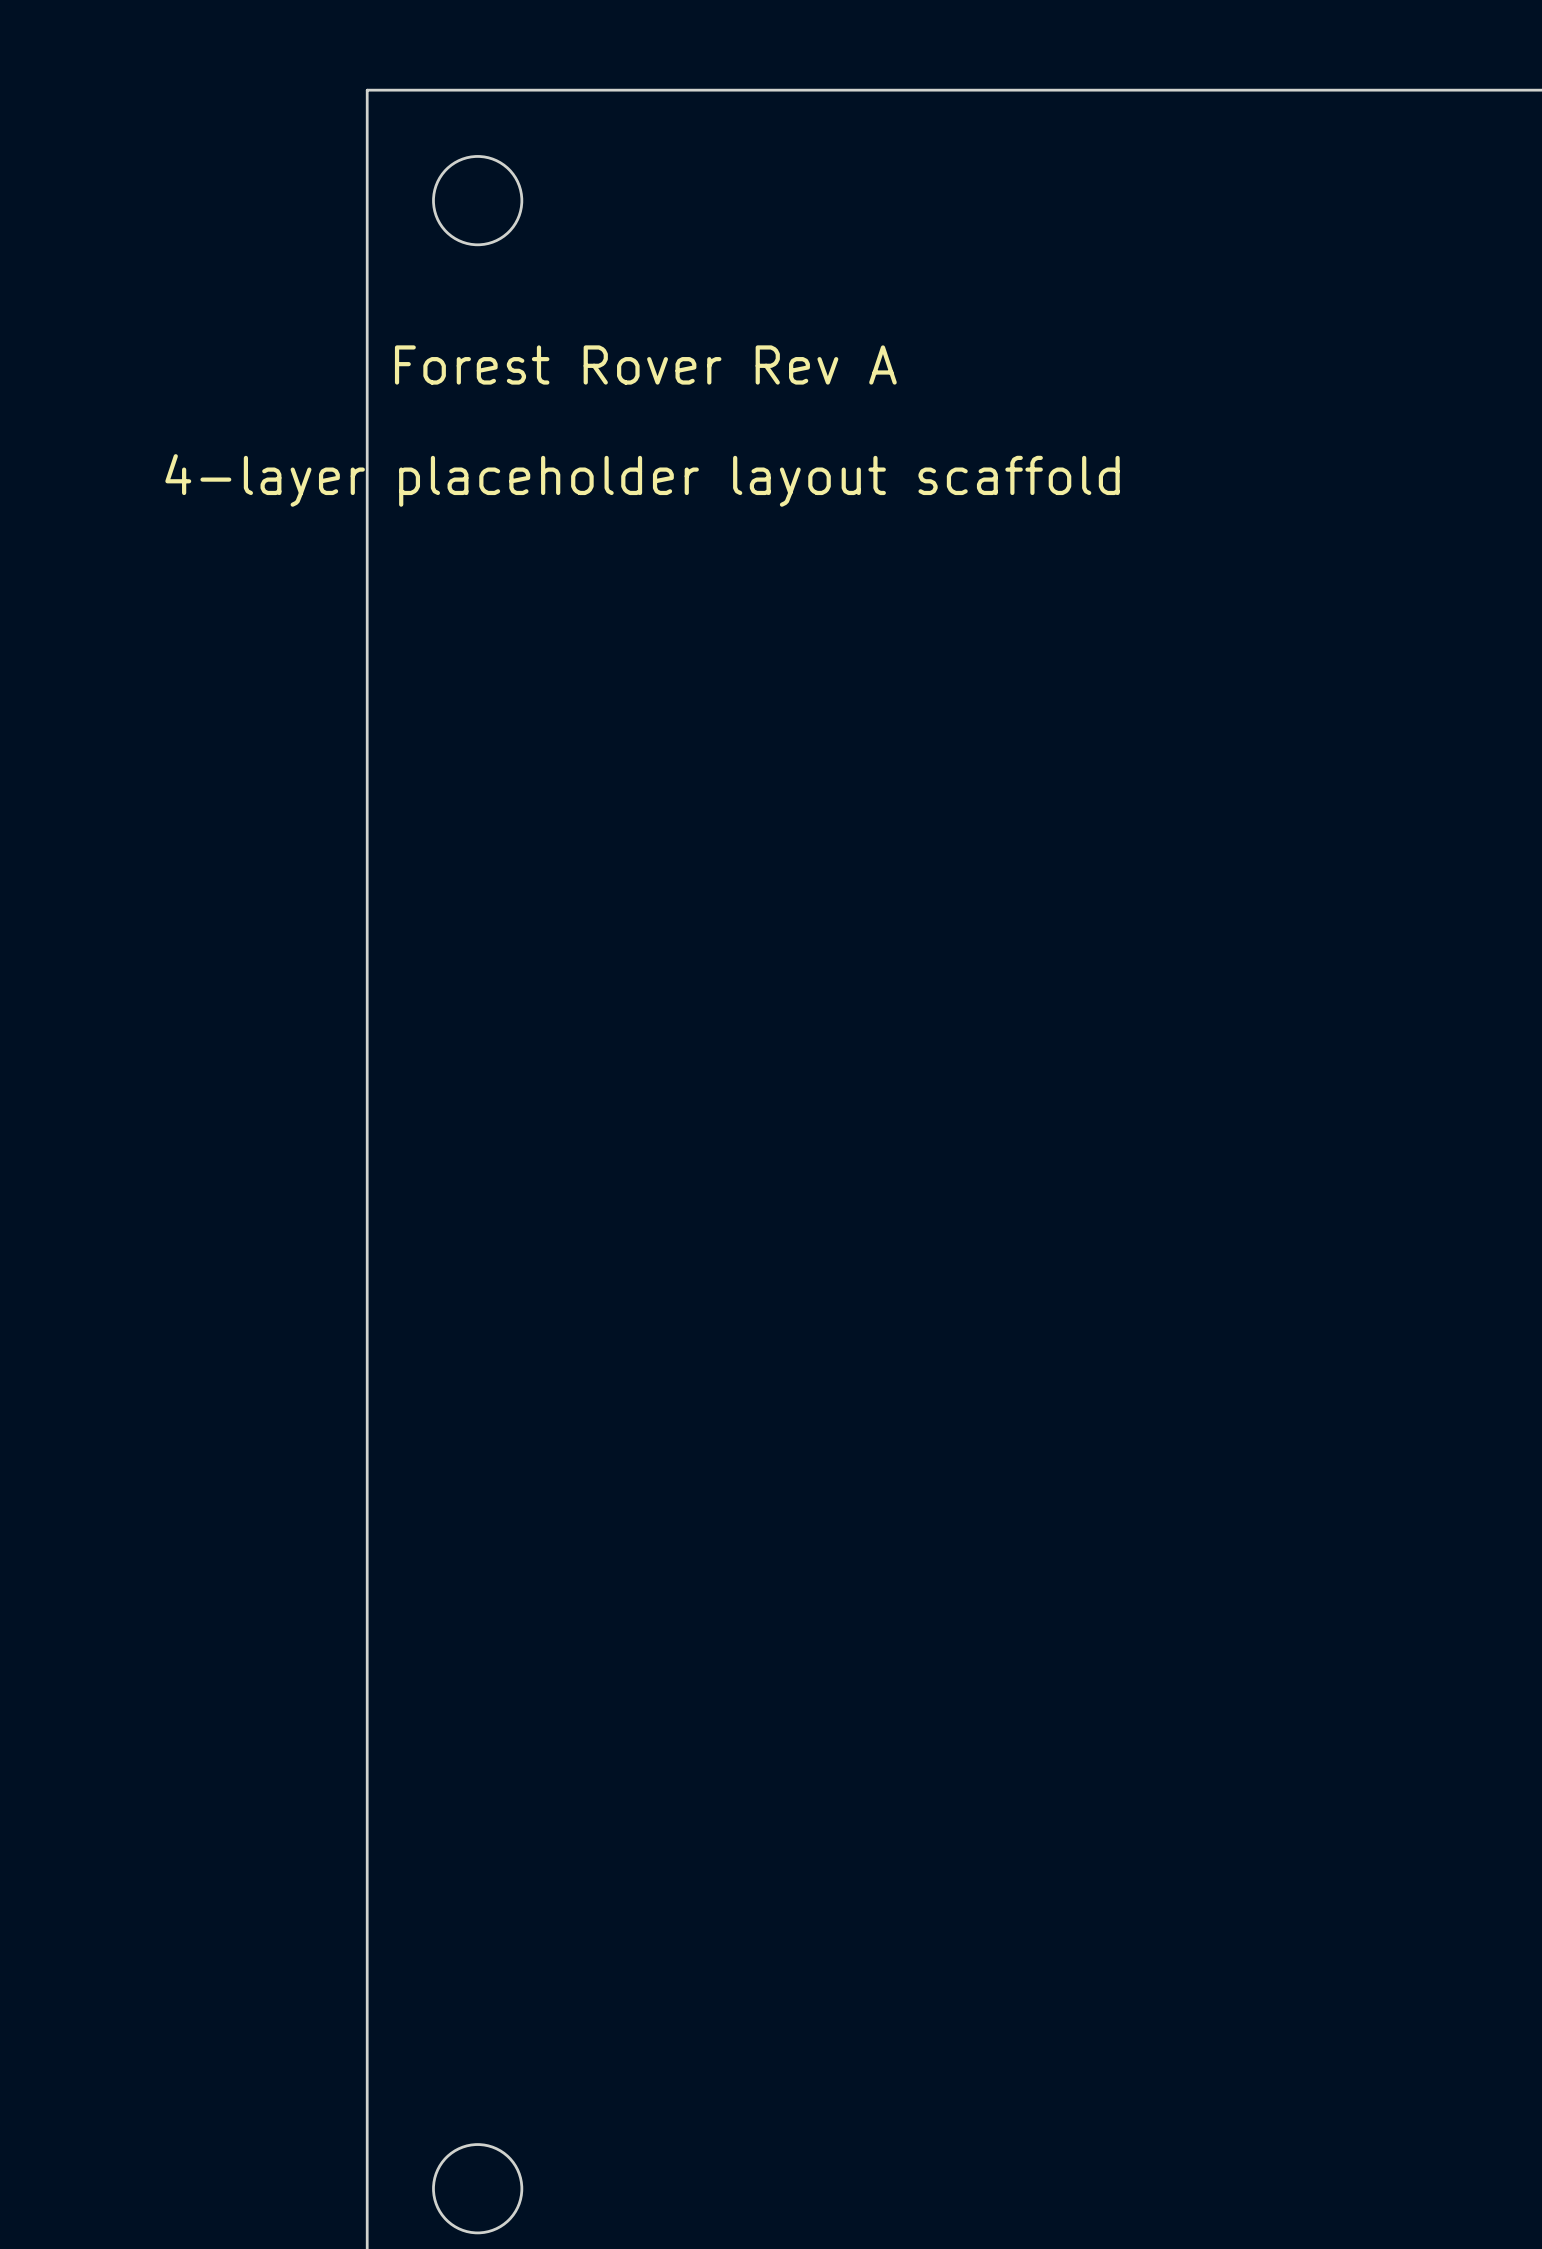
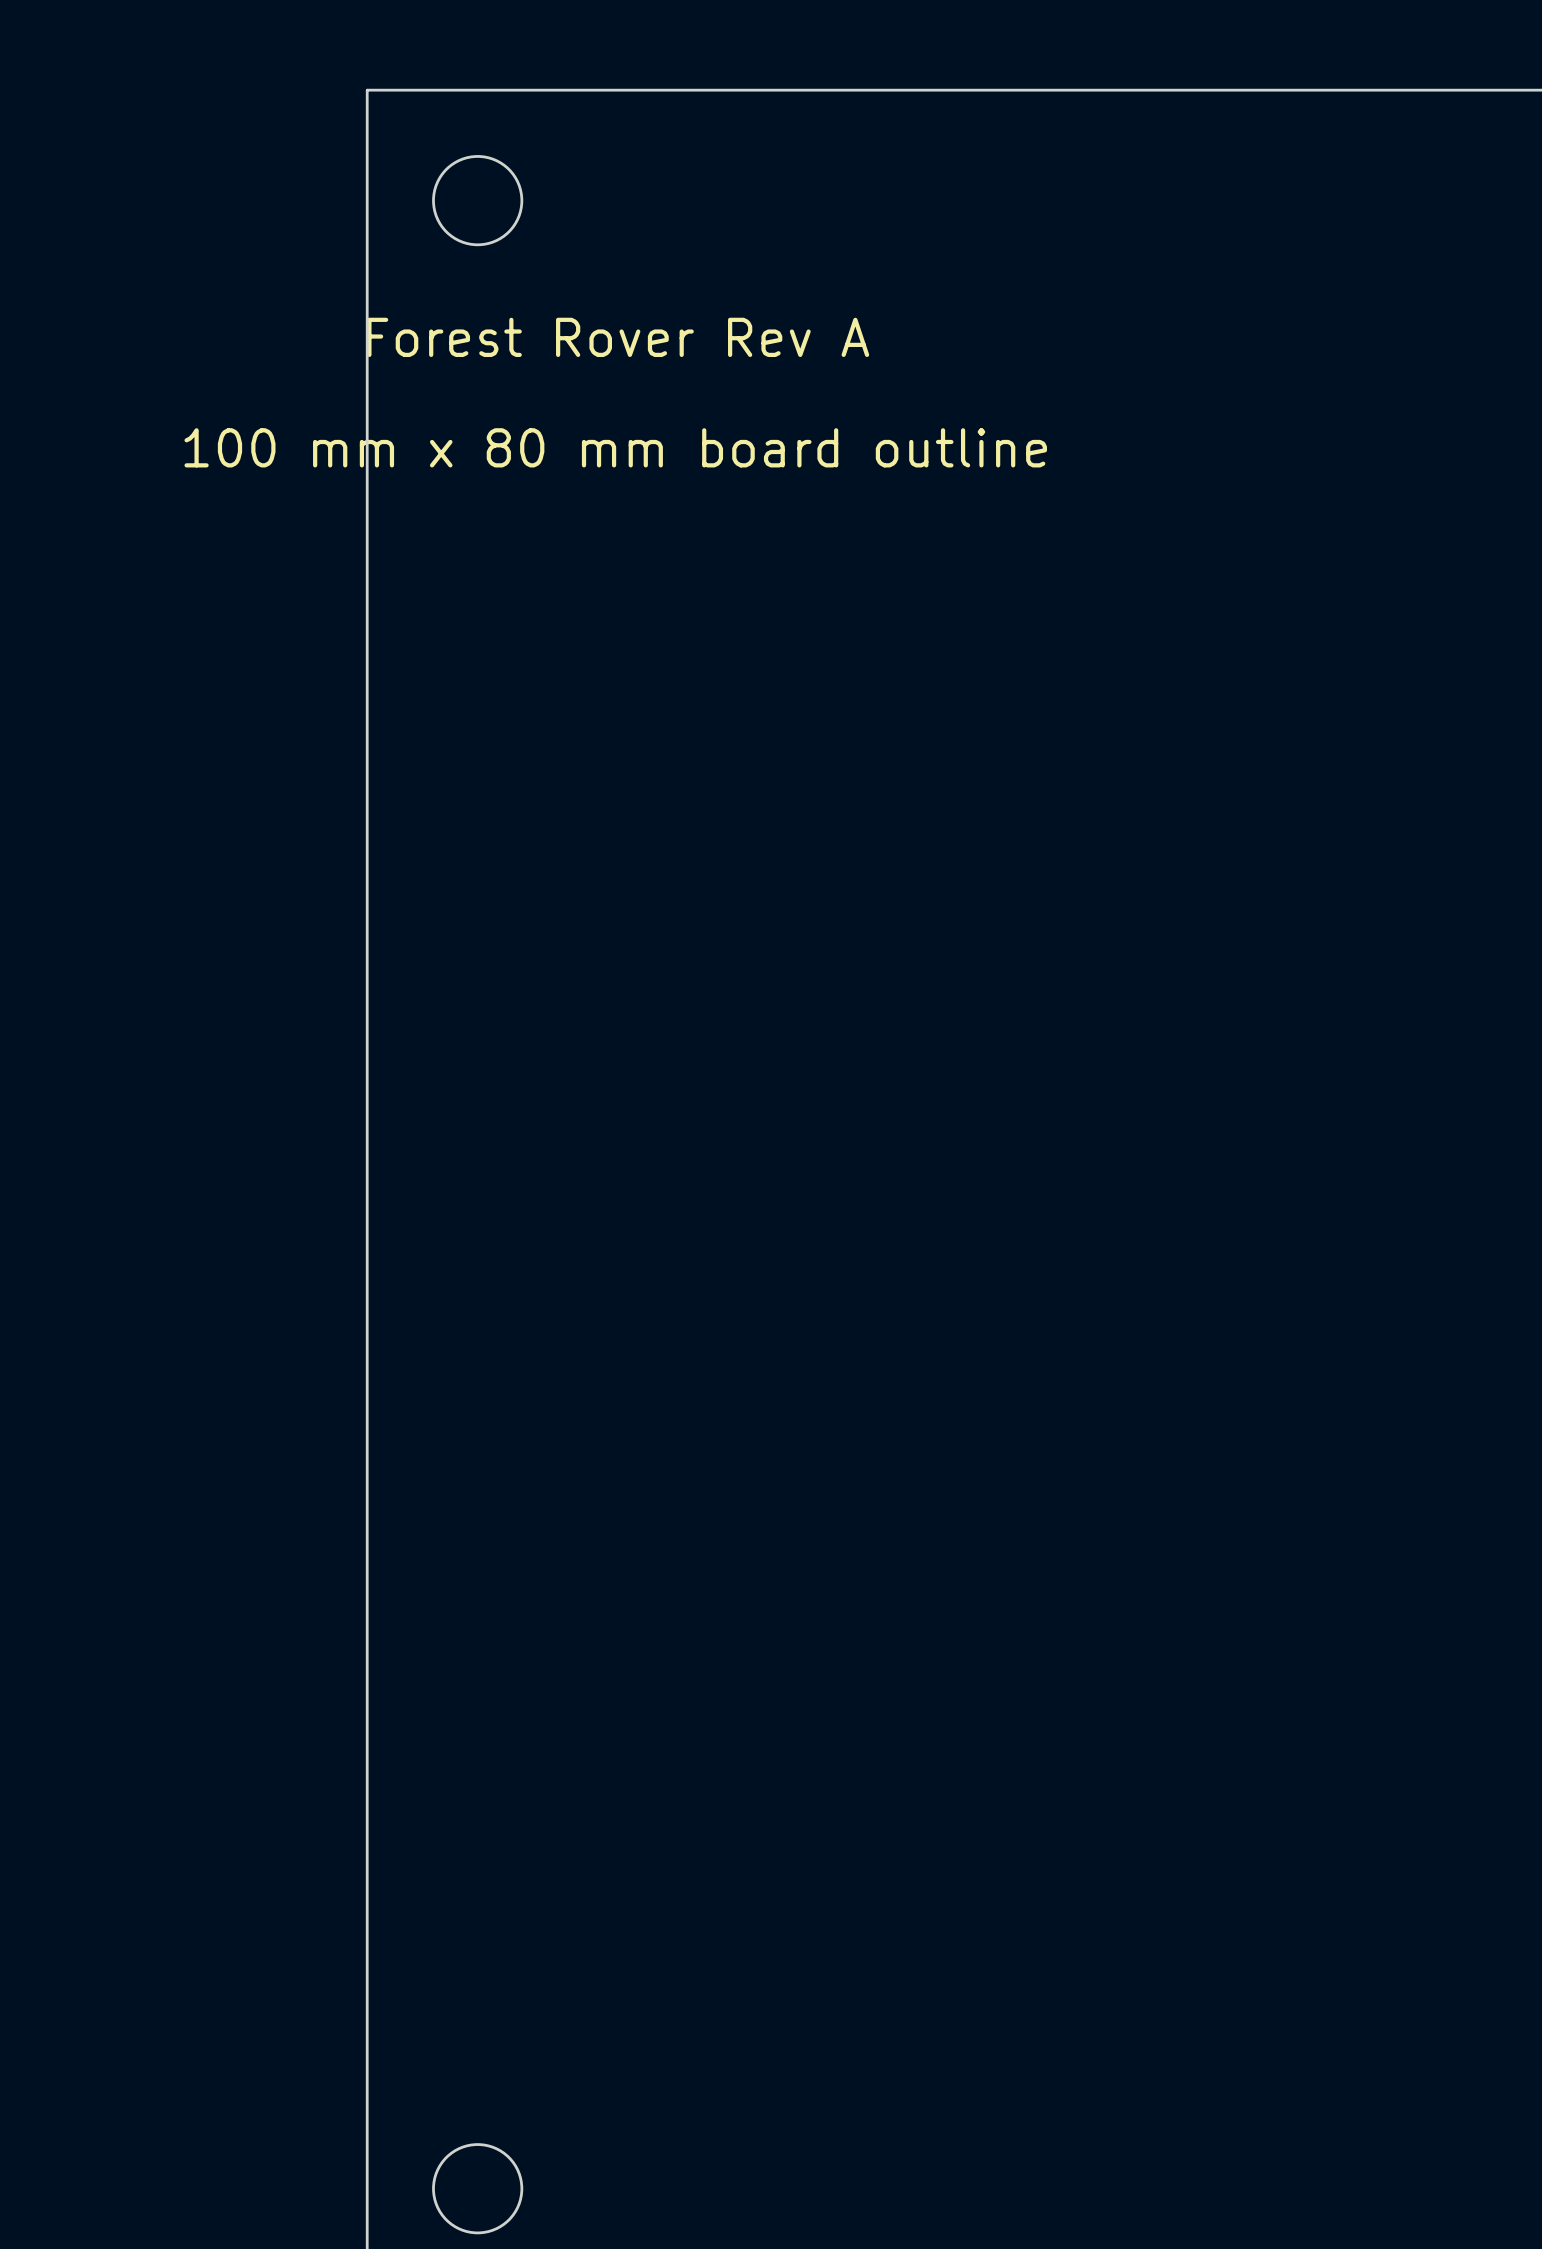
text position: Forest Rover Rev A (645, 364) -> Forest Rover Rev A (618, 337)
text: none -> 100 mm x 80 mm board outline (615, 447)
text: 4-layer placeholder layout scaffold (642, 480) -> none

